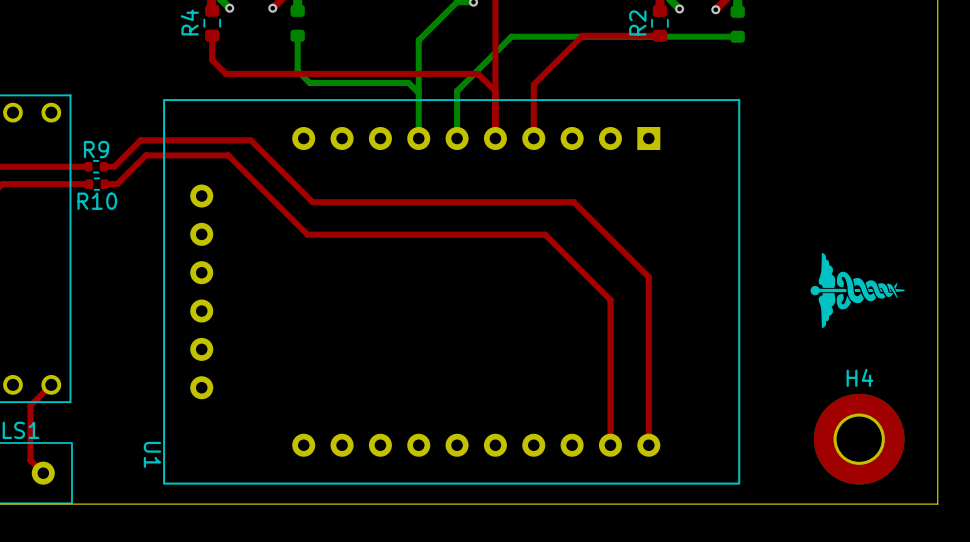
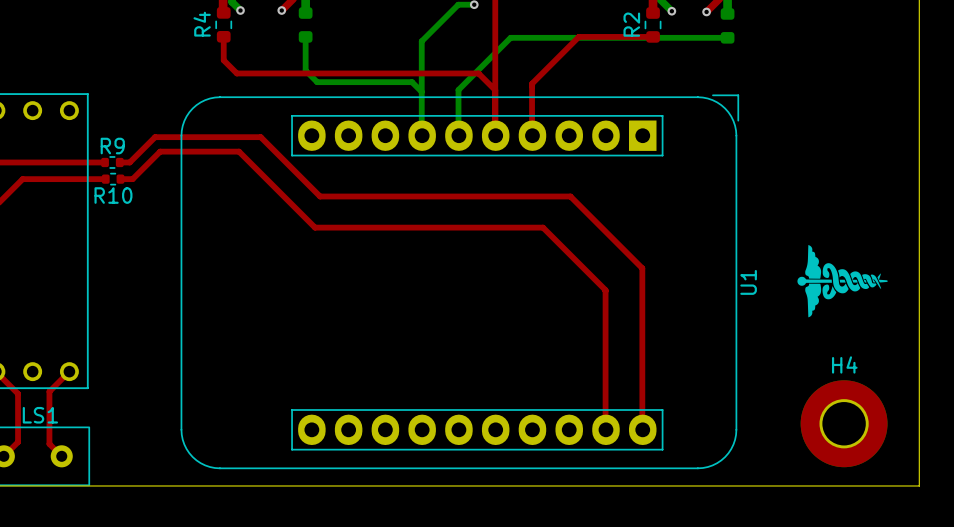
U1 footprint: [163, 99, 741, 485] -> [180, 94, 740, 470]
U1 name position: U1 (152, 454) -> U1 (748, 282)

